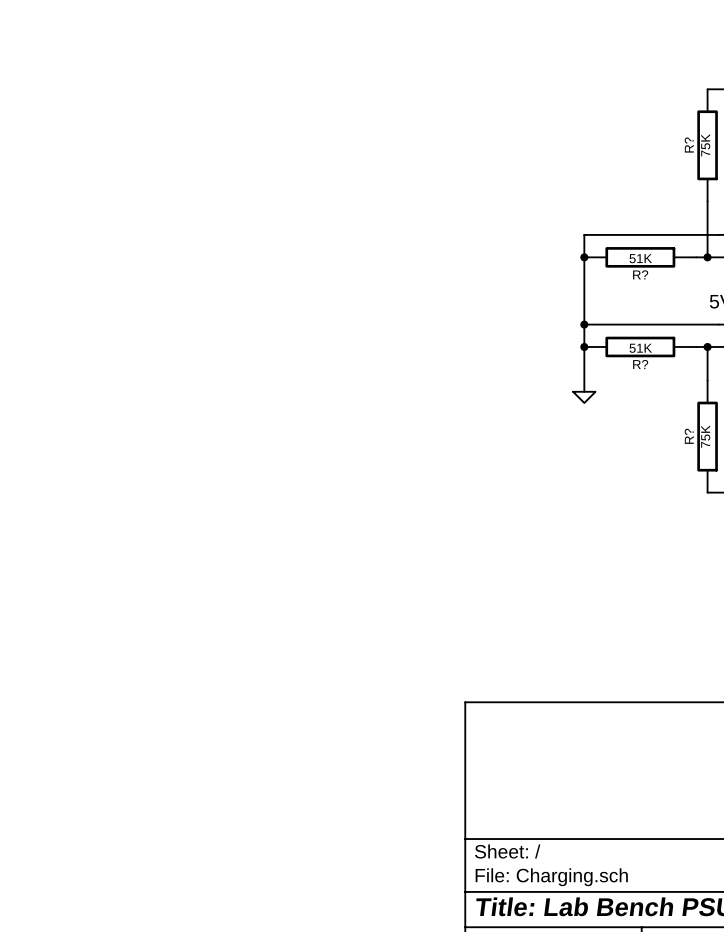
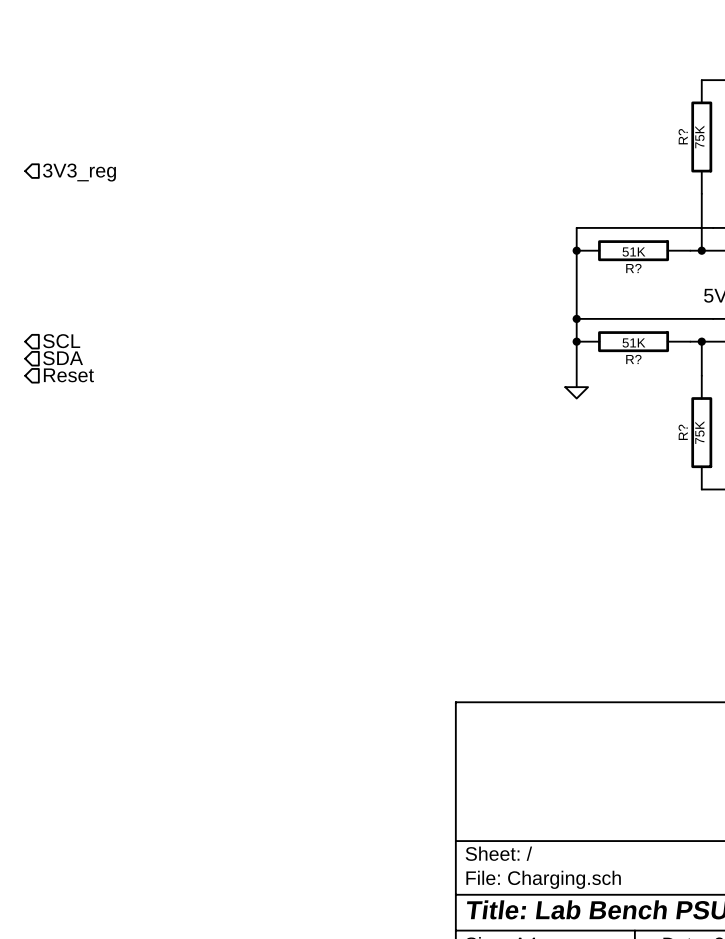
hierarchical label: none -> 3V3_reg (79, 172)
hierarchical label: none -> SCL (61, 341)
hierarchical label: none -> SDA (63, 358)
hierarchical label: none -> Reset (68, 375)

